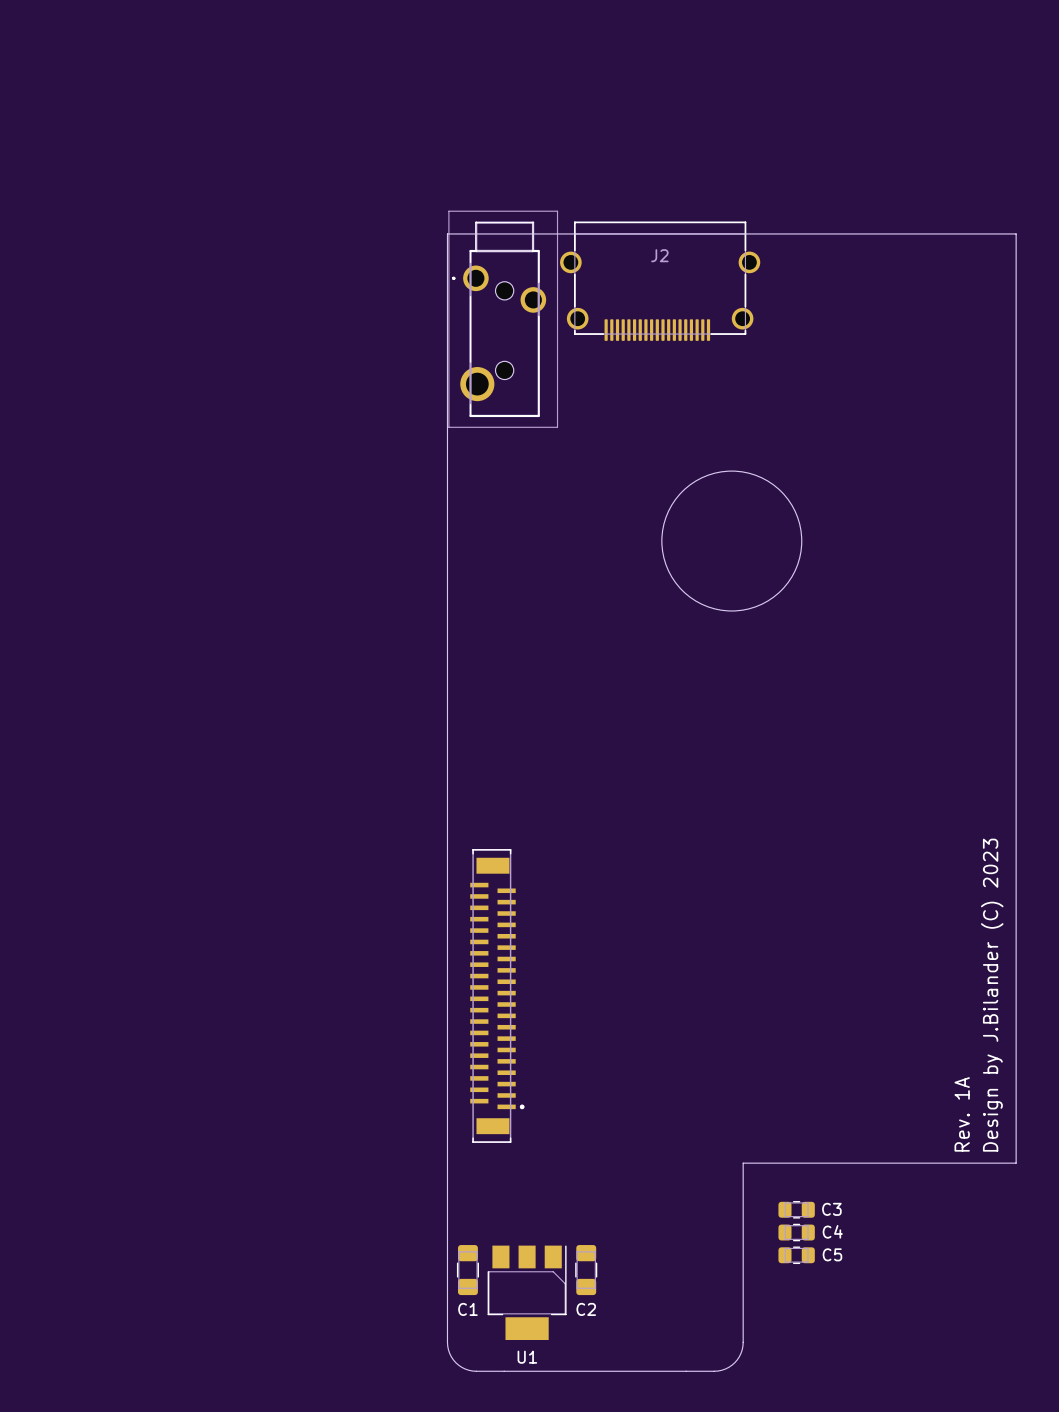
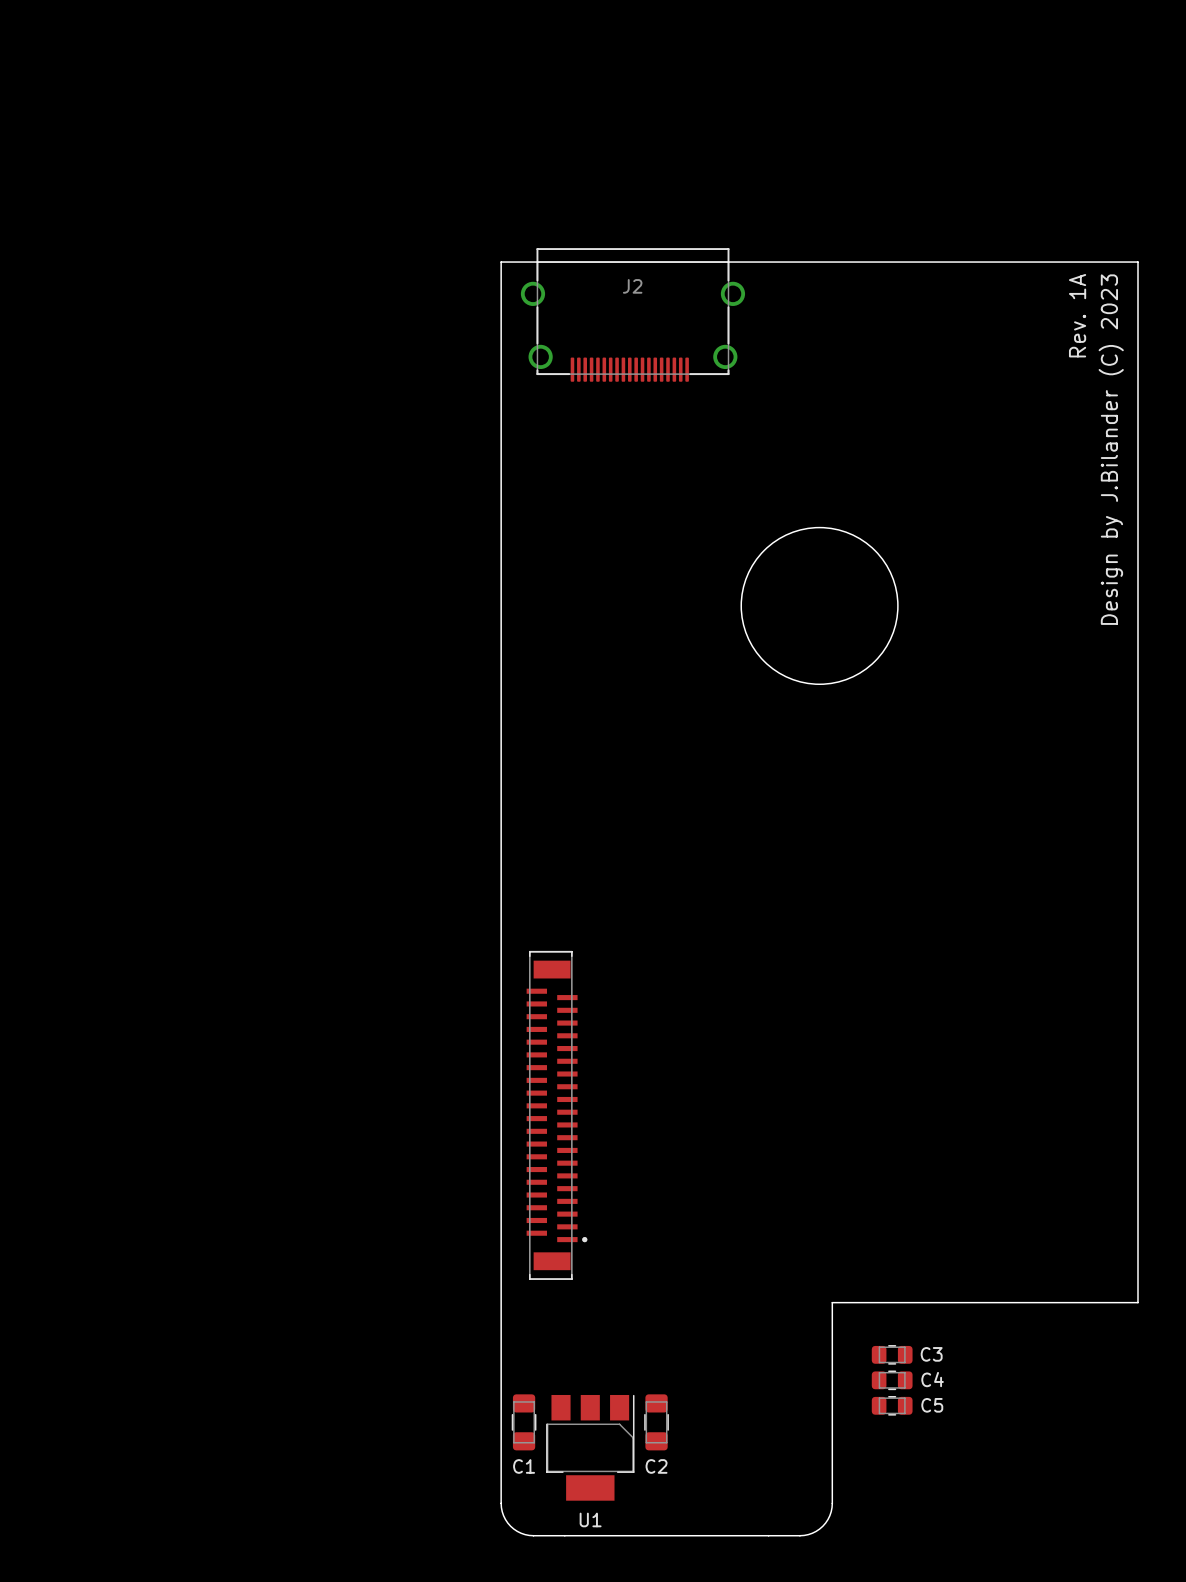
J2 position: (660, 281) -> (632, 314)
text: none -> Rev. 1A (1077, 315)
part: (503, 319) -> none
text: none -> Design by J.Bilander (C) 2023 (1111, 449)
text: Design by J.Bilander (C) 2023 (992, 995) -> none
text: Rev. 1A (962, 1114) -> none

